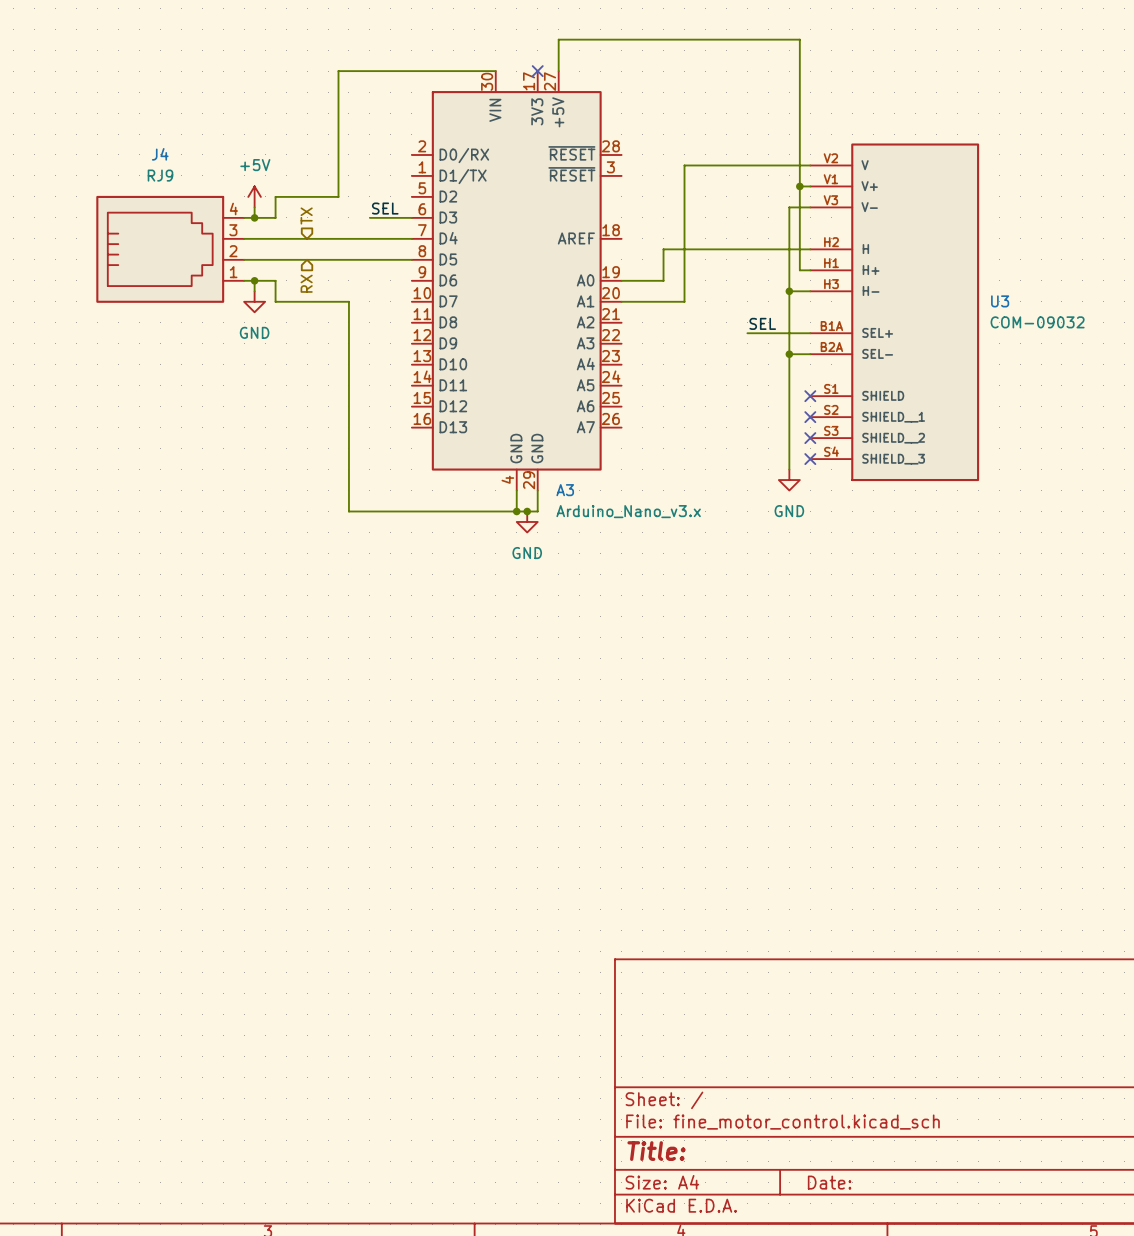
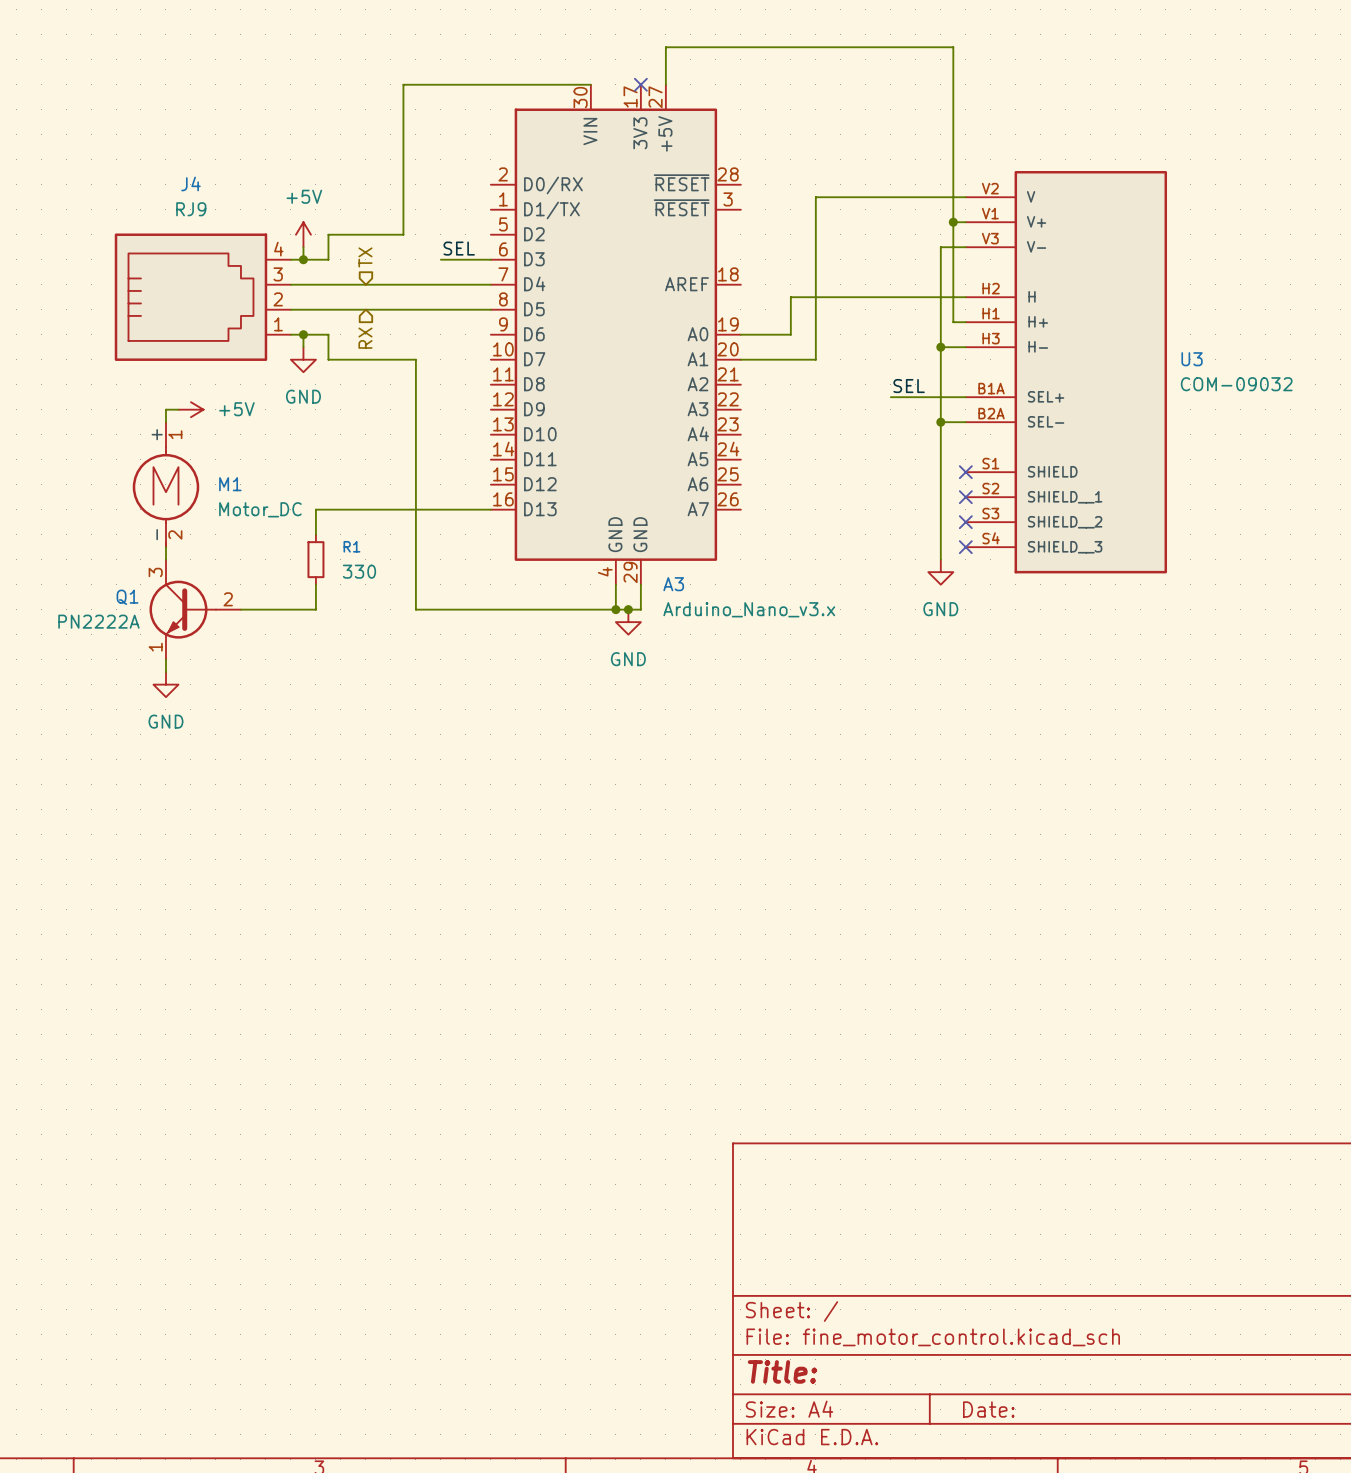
wire: none -> (178, 409) (165, 409) (165, 422)
power symbol: none -> +5V (190, 409)
M1: none -> Motor_DC (165, 484)
wire: none -> (490, 509) (315, 509) (315, 534)
wire: none -> (165, 547) (165, 559)
R1: none -> 330 (315, 559)
wire: none -> (315, 584) (315, 609) (240, 609)
Q1: none -> PN2222A (195, 609)
wire: none -> (165, 659) (165, 672)
power symbol: none -> GND (165, 684)

